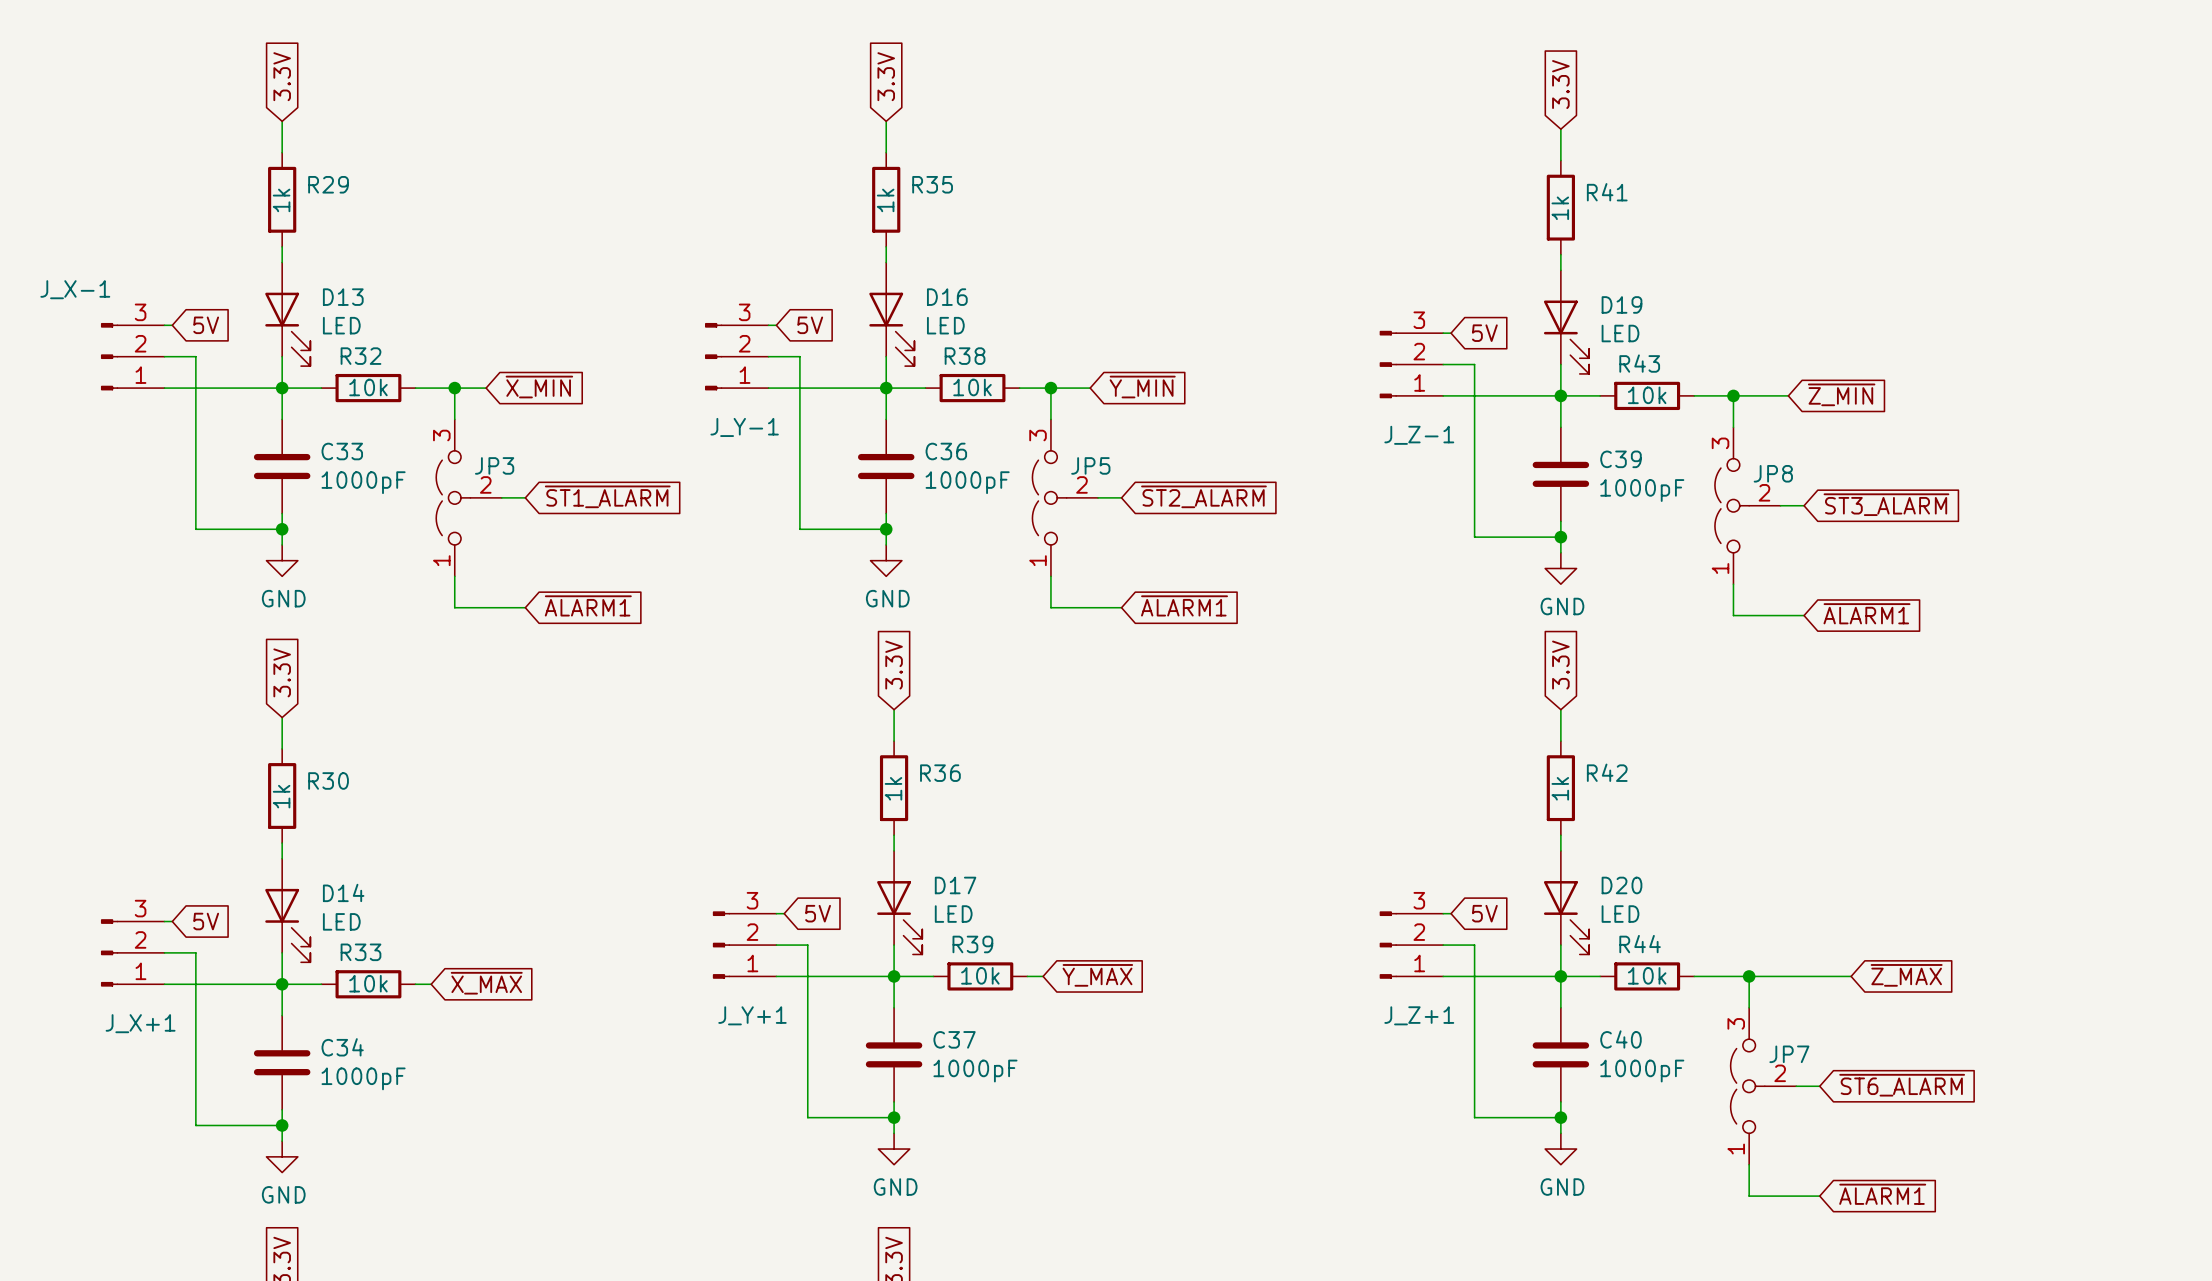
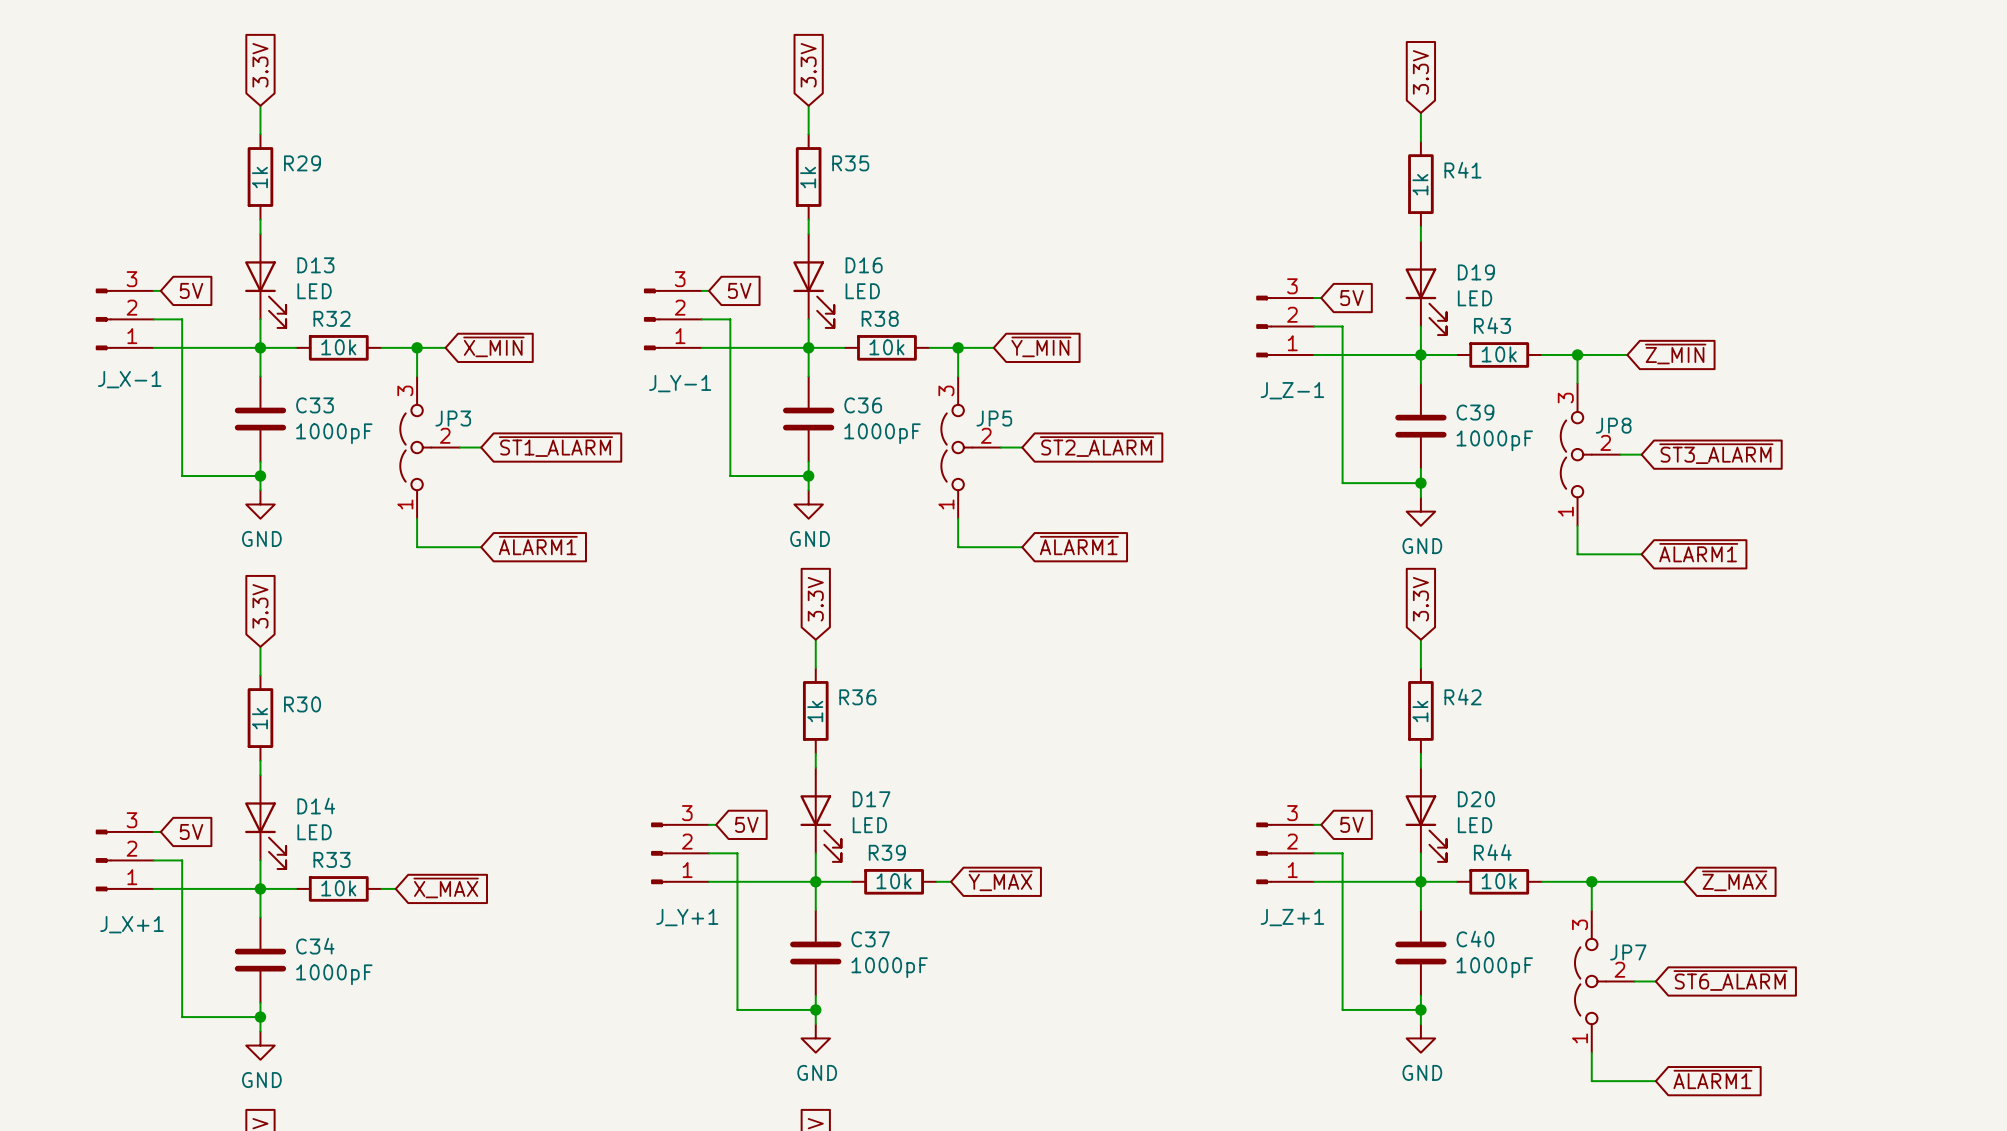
J_X-1 name position: J_X-1 (75, 289) -> J_X-1 (129, 379)

